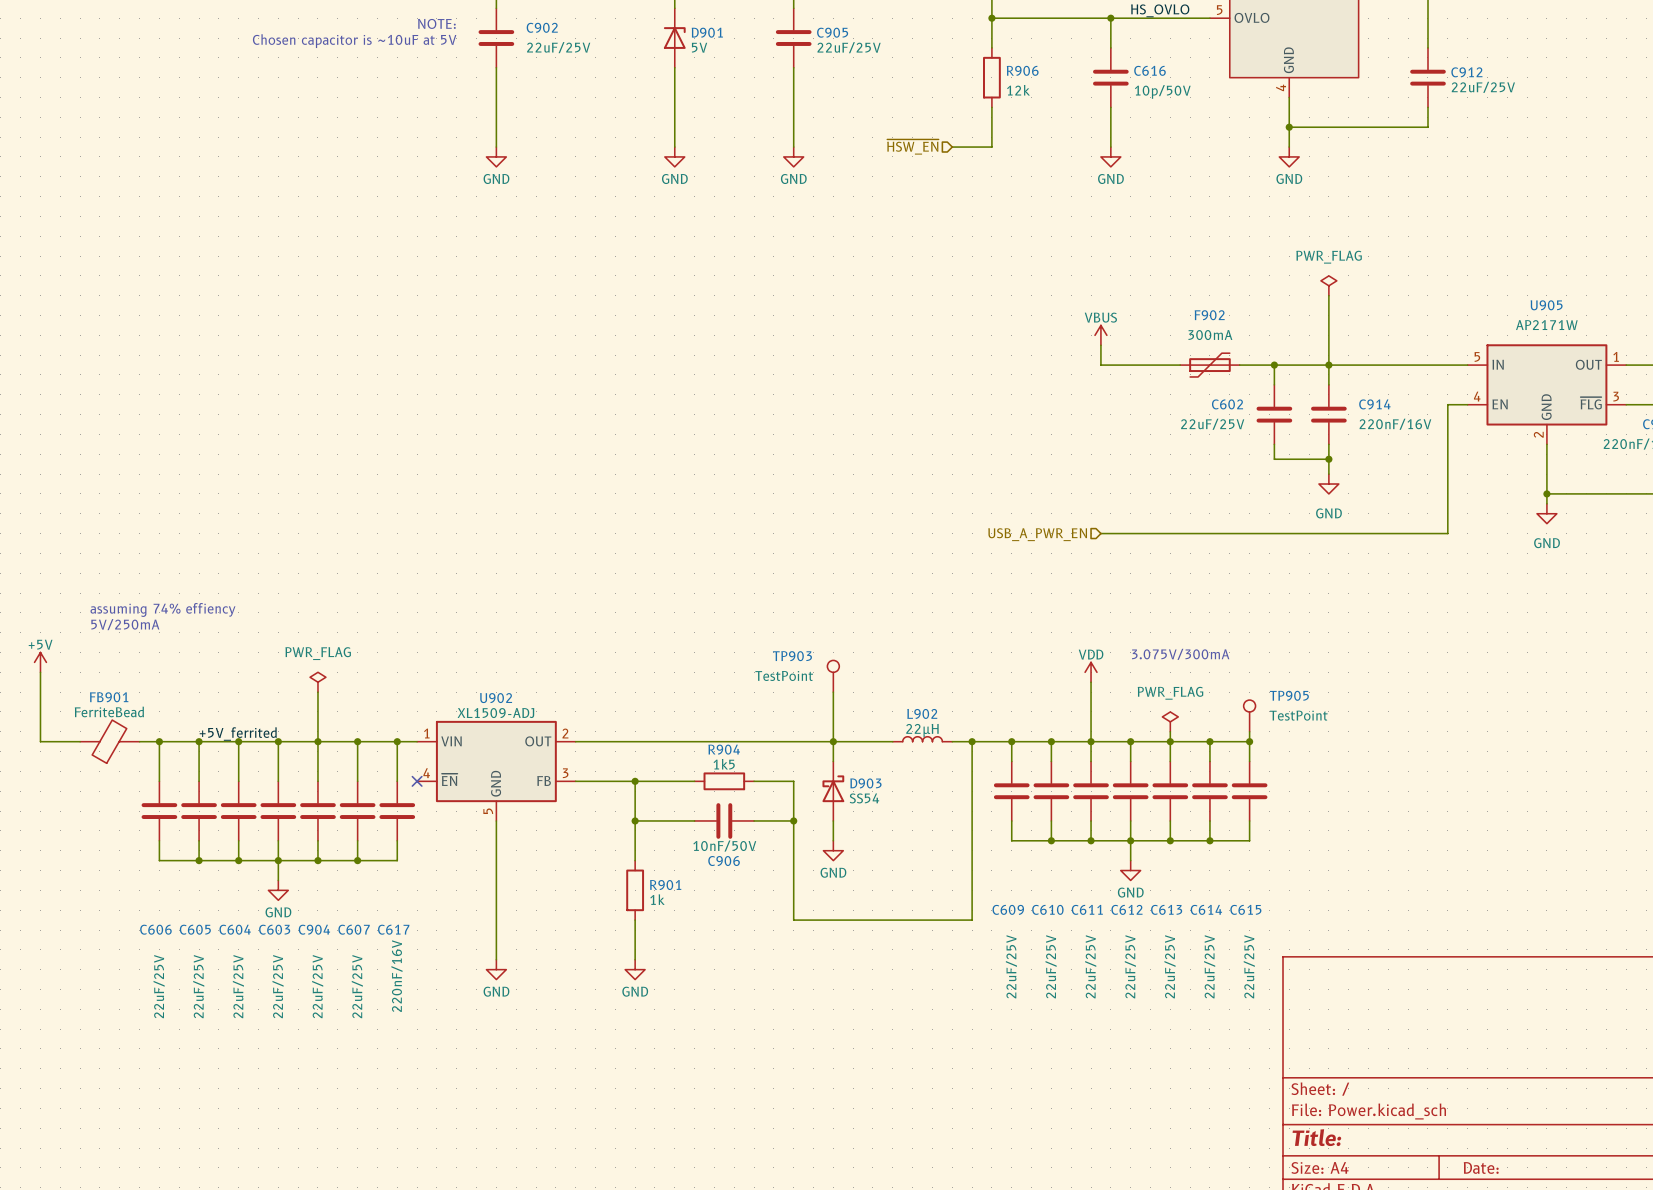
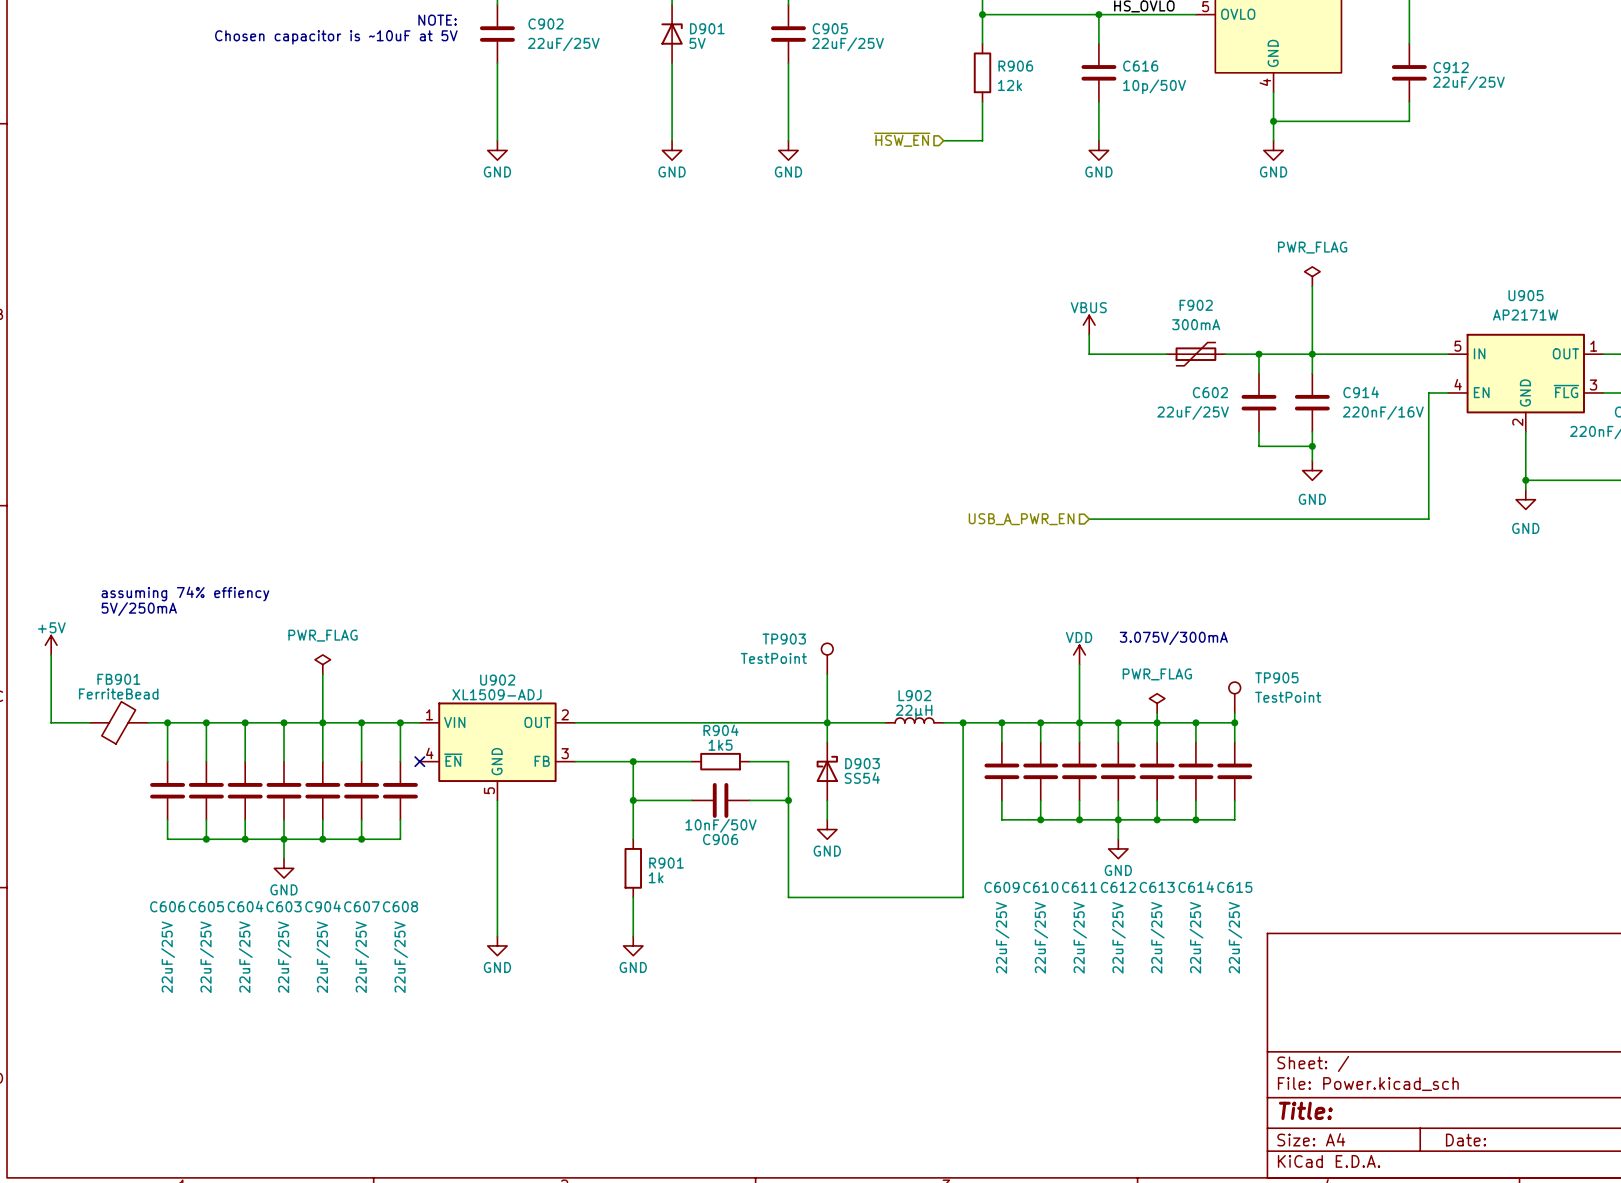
label: +5V_ferrited (238, 734) -> none
C617 name: C617 (393, 929) -> C608 (400, 906)
C617 value: 220nF/16V (396, 976) -> 22uF/25V (400, 957)

